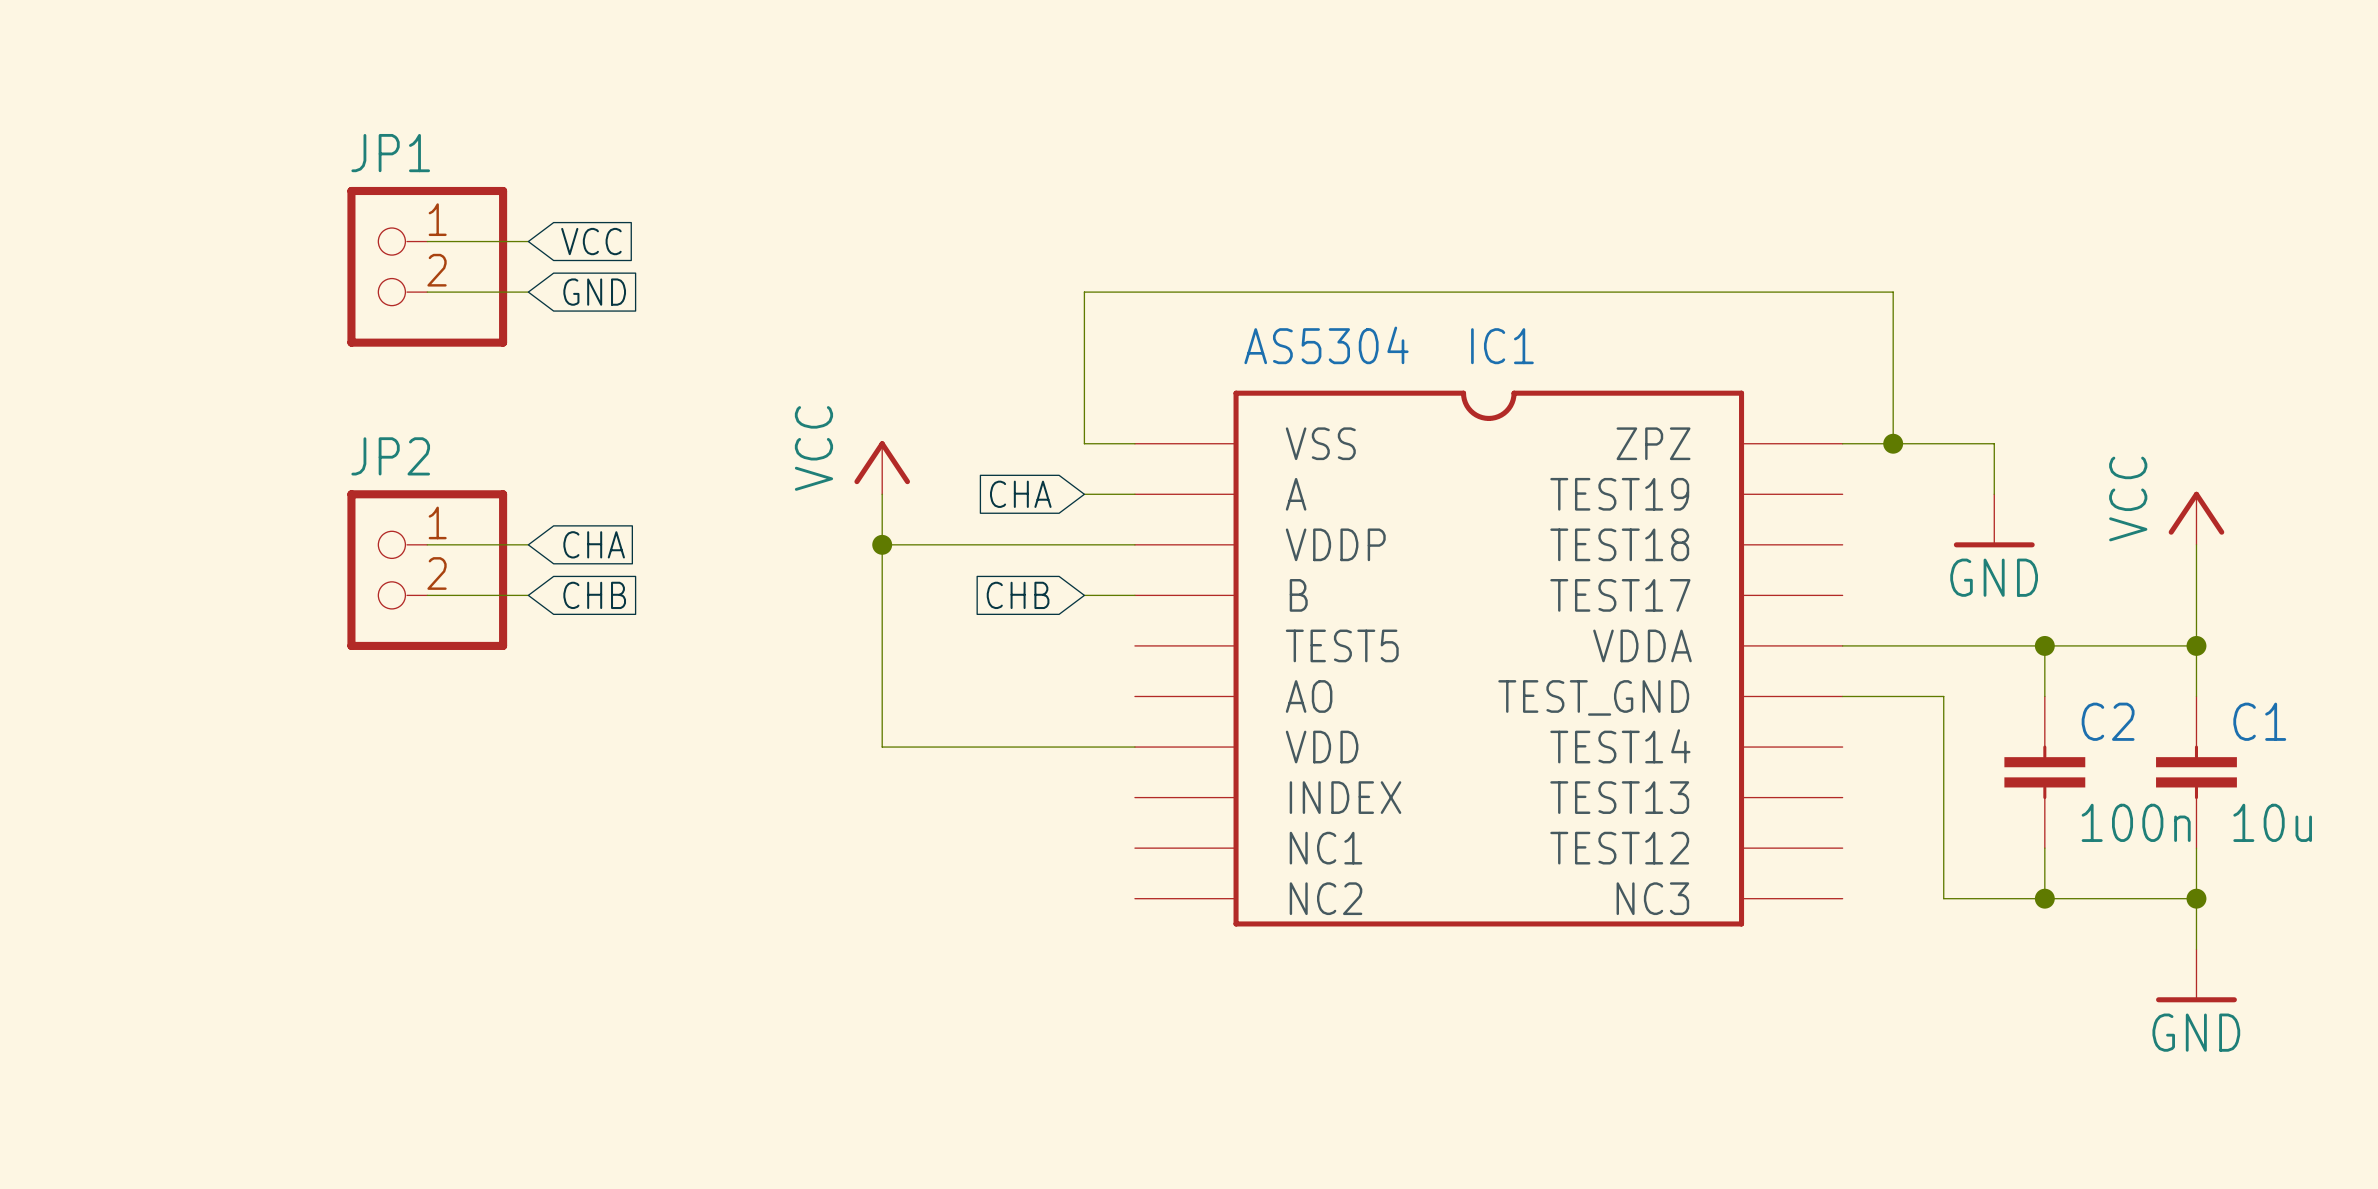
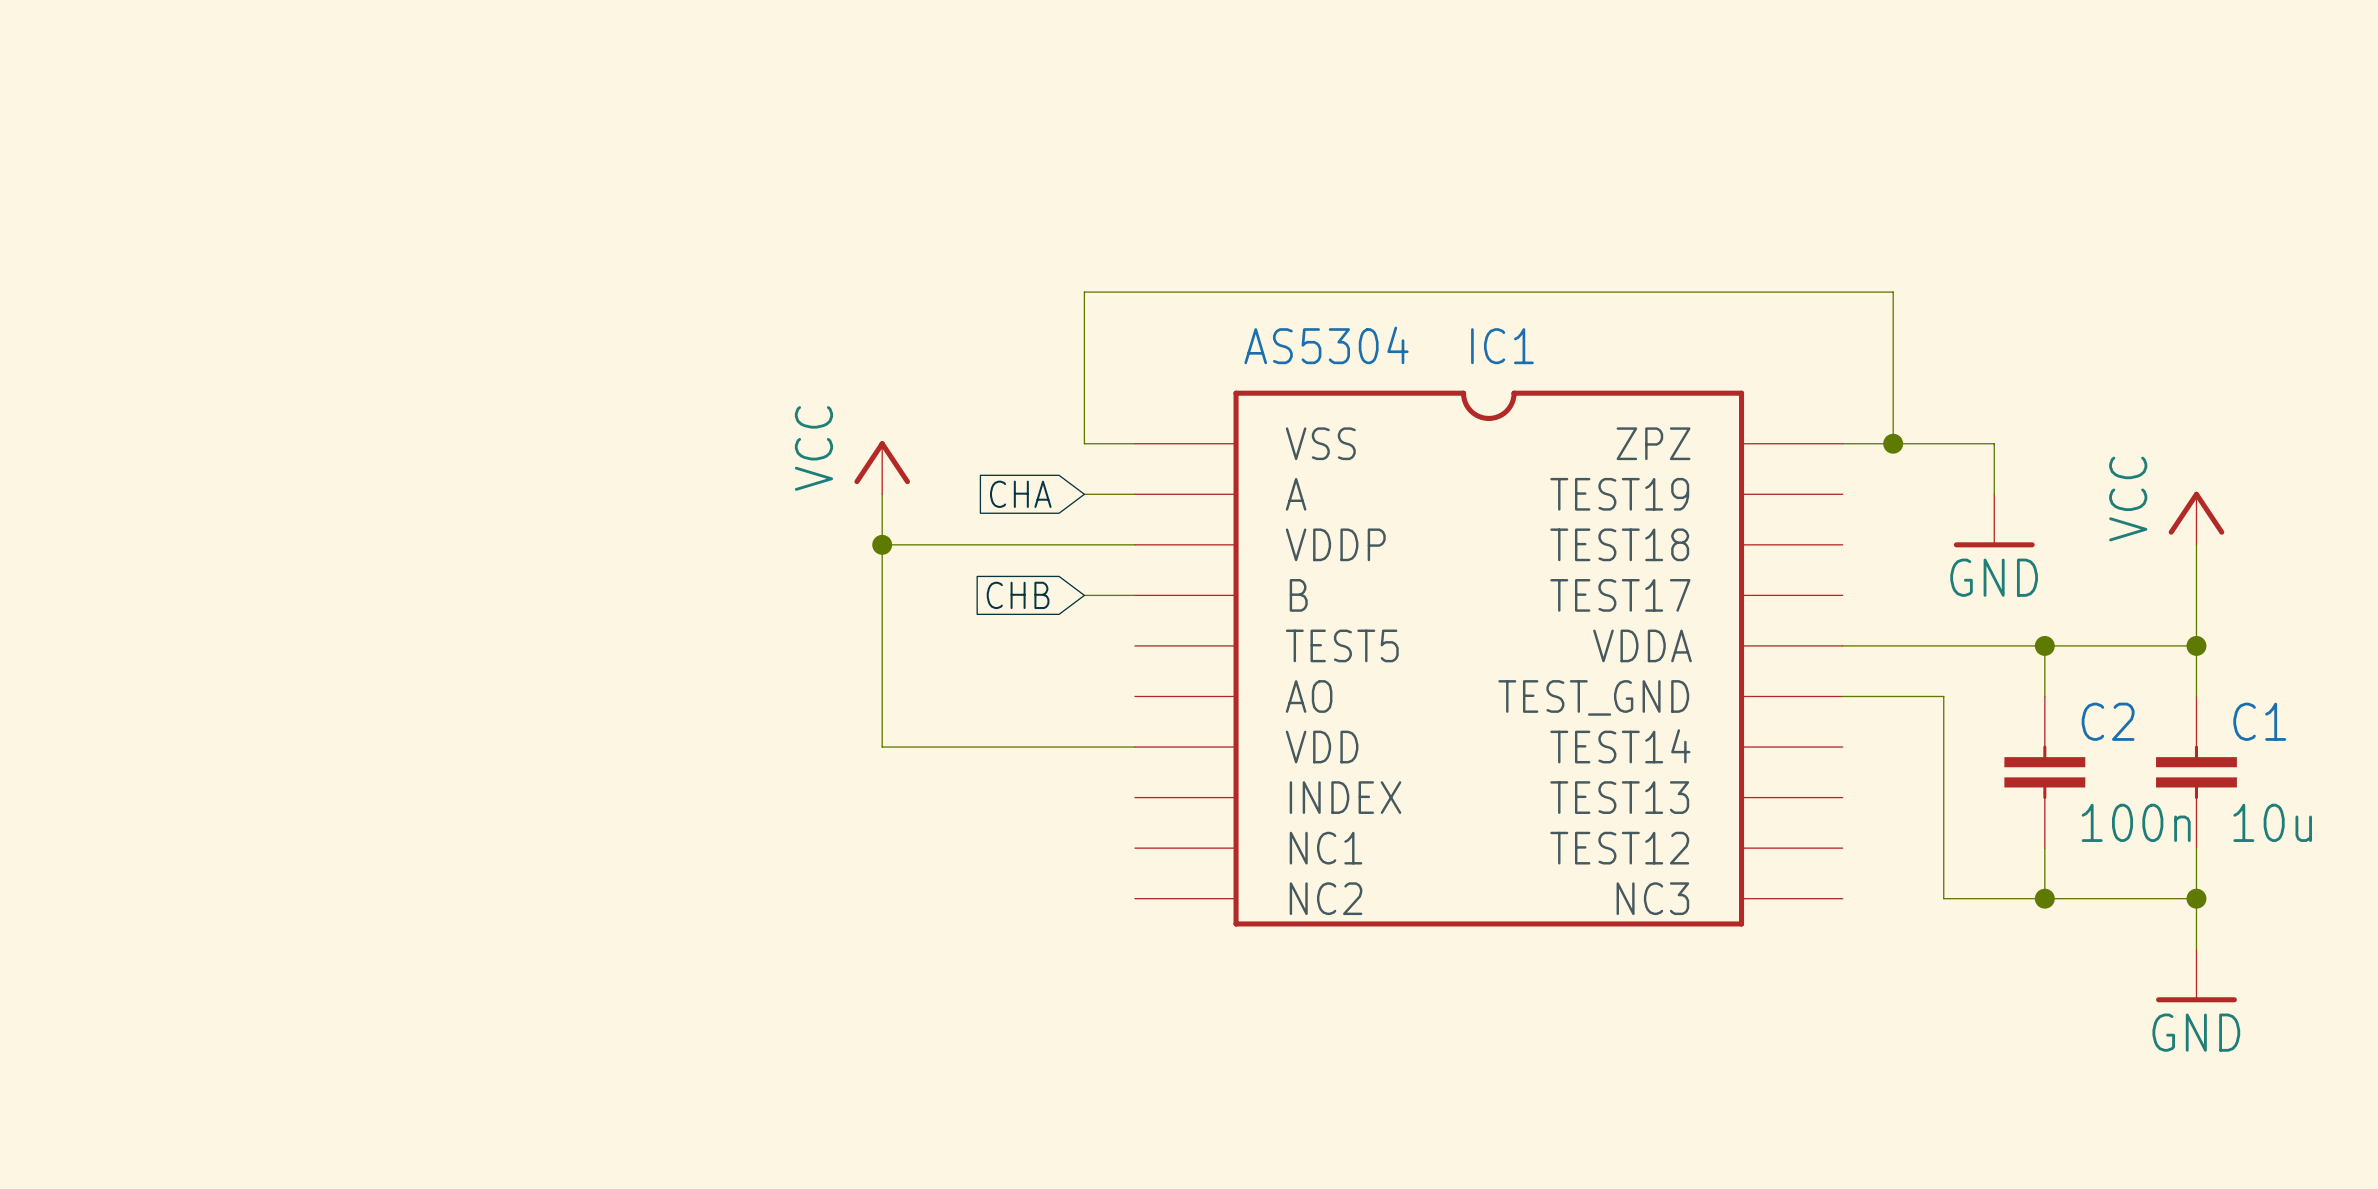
wire: (427, 241) (528, 241) -> none
global label: VCC (591, 241) -> none
JP1: (427, 266) -> none
wire: (427, 292) (528, 292) -> none
global label: GND (594, 292) -> none
wire: (427, 544) (528, 544) -> none
global label: CHA (594, 544) -> none
JP2: (427, 570) -> none
wire: (427, 595) (528, 595) -> none
global label: CHB (594, 595) -> none

